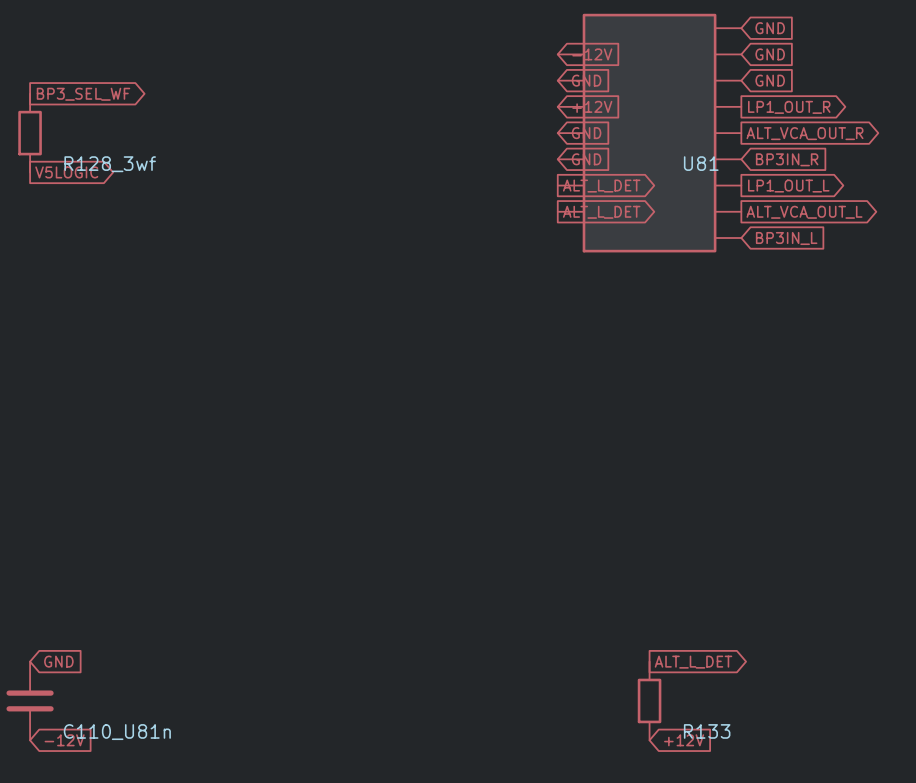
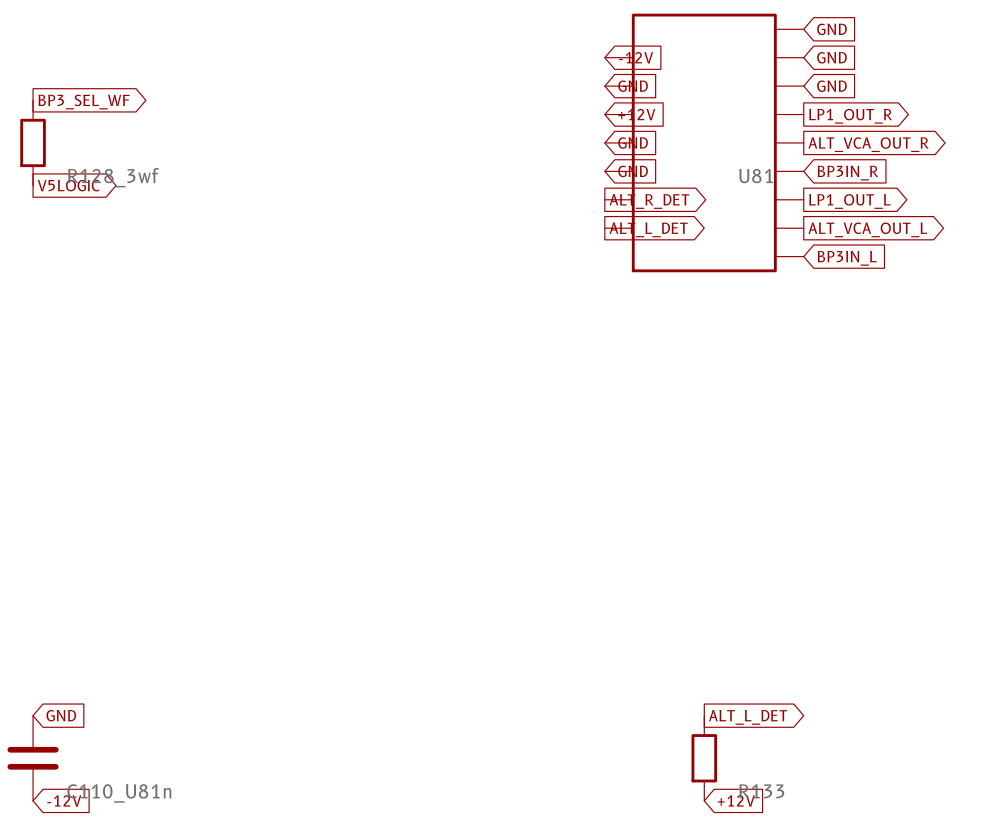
global label: ALT_L_DET (601, 186) -> ALT_R_DET (649, 201)

